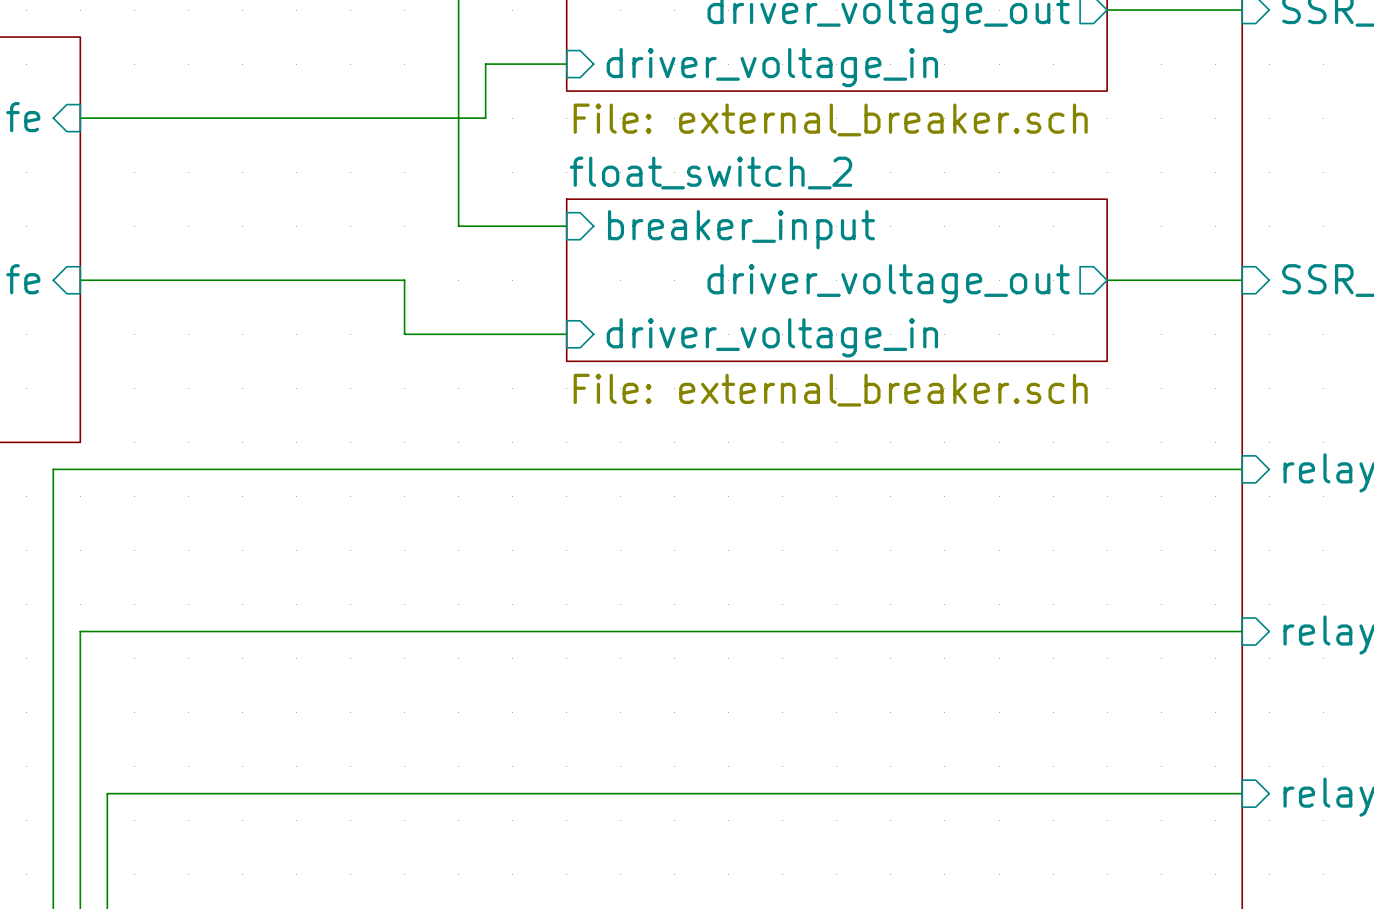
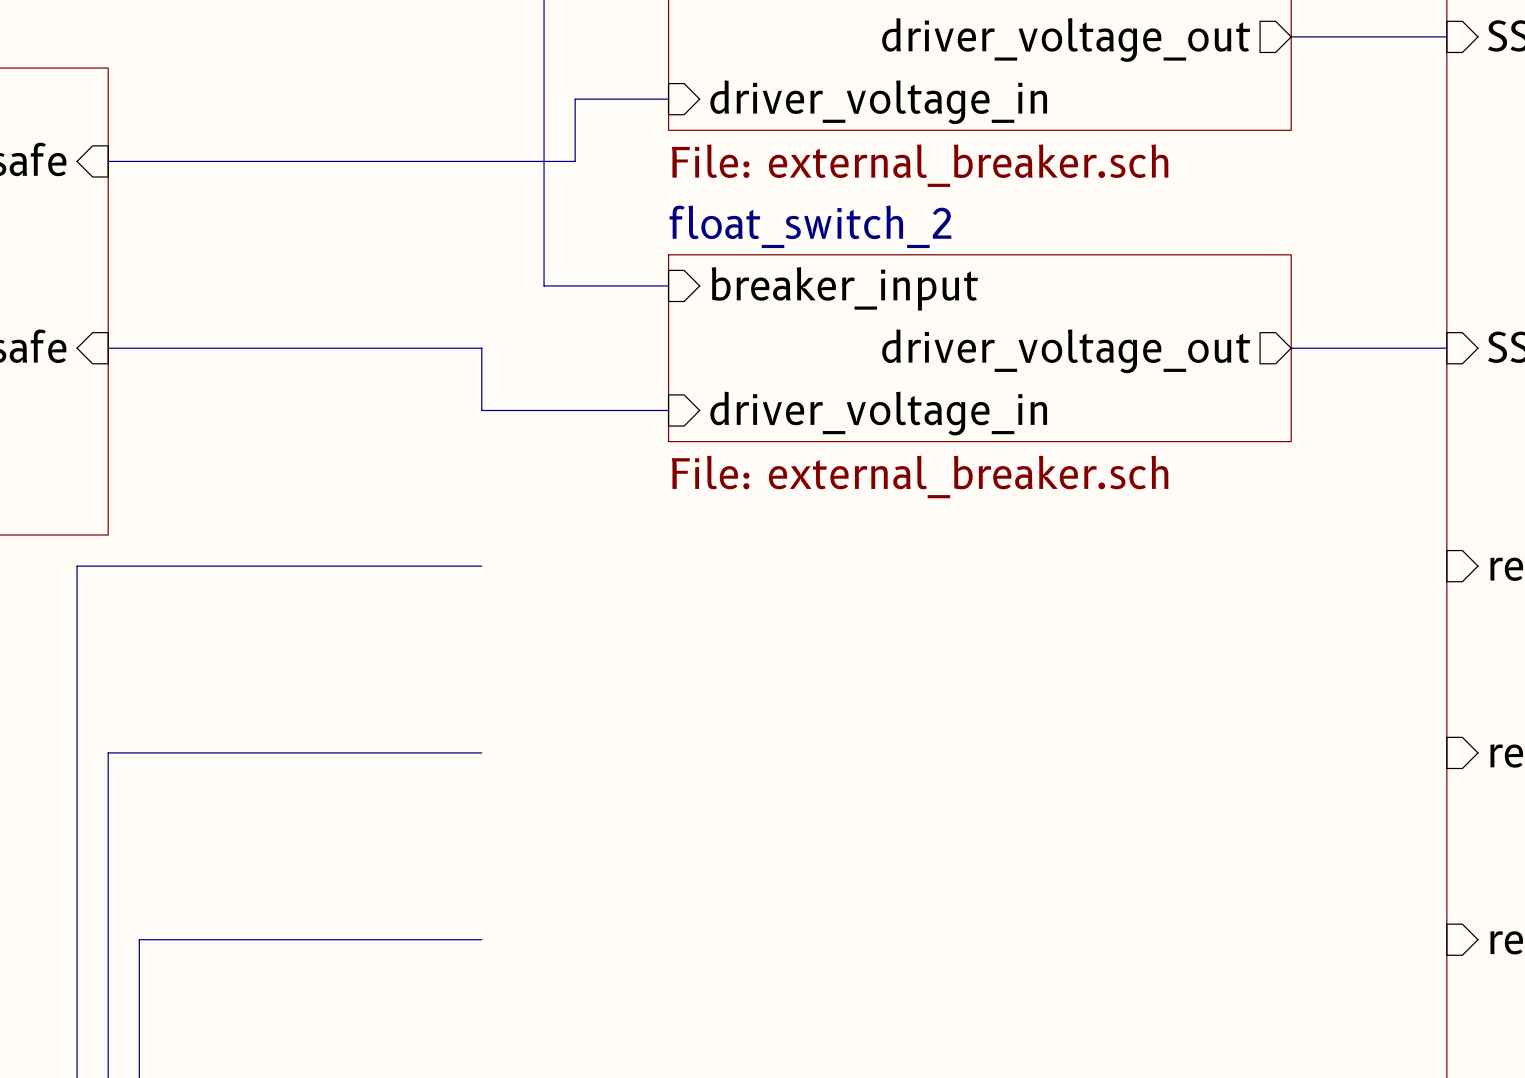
wire: (404, 469) (1242, 469) -> none
wire: (404, 631) (1242, 631) -> none
wire: (404, 793) (1242, 793) -> none

